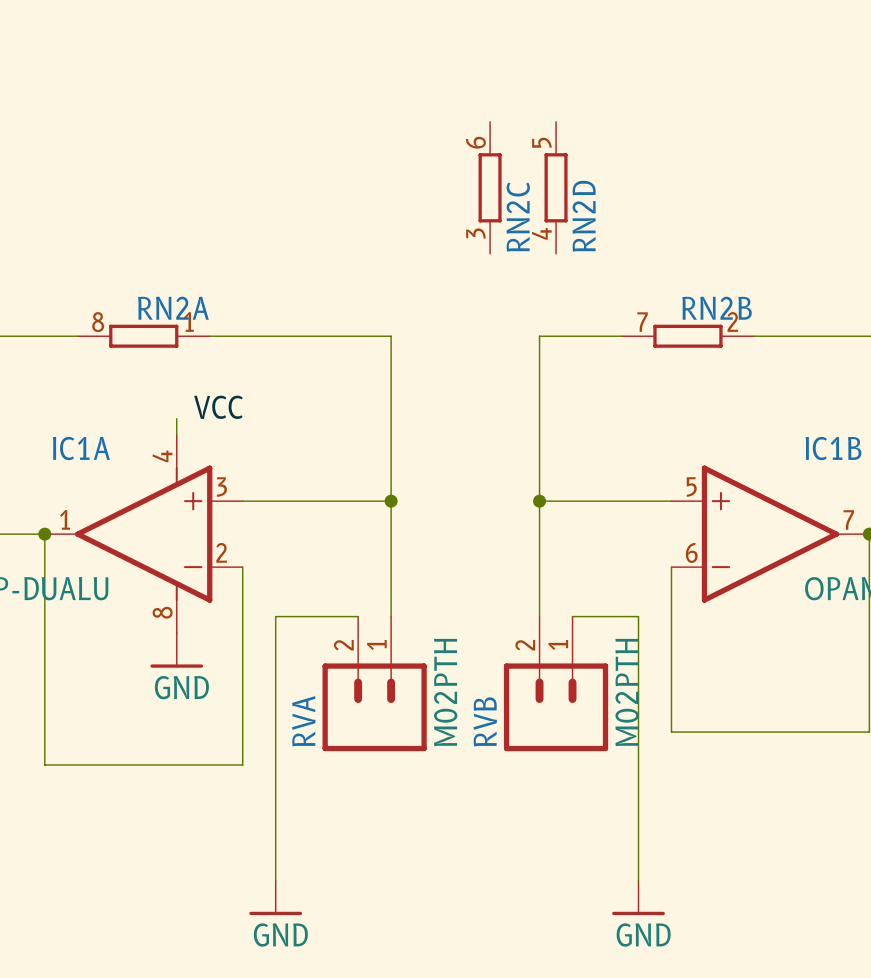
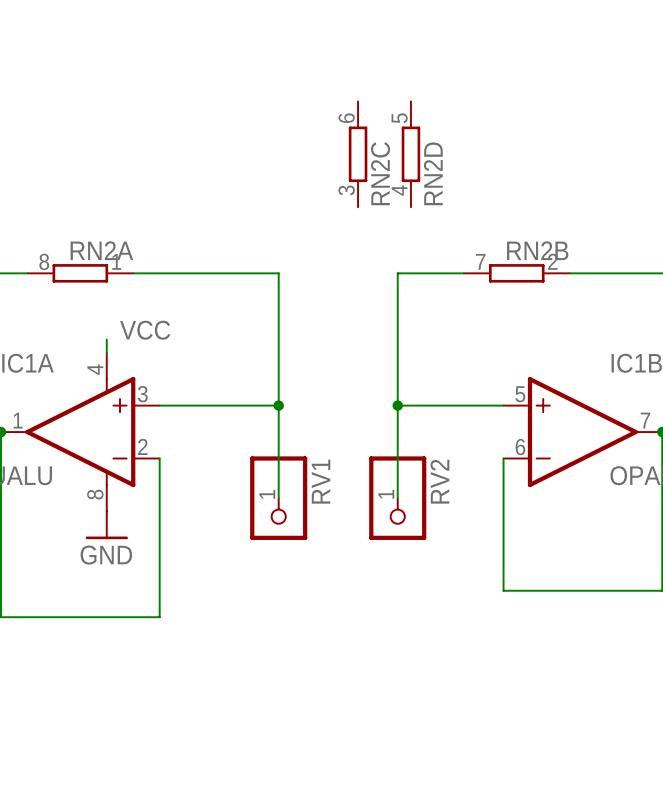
wire: (358, 616) (275, 616) (275, 880) -> none
RV1: none -> (278, 498)
RV2: none -> (397, 498)
wire: (572, 616) (638, 616) (638, 880) -> none
RVA: M02PTH (374, 683) -> none
RVB: M02PTH (556, 683) -> none
power symbol: GND (275, 897) -> none
power symbol: GND (638, 897) -> none

